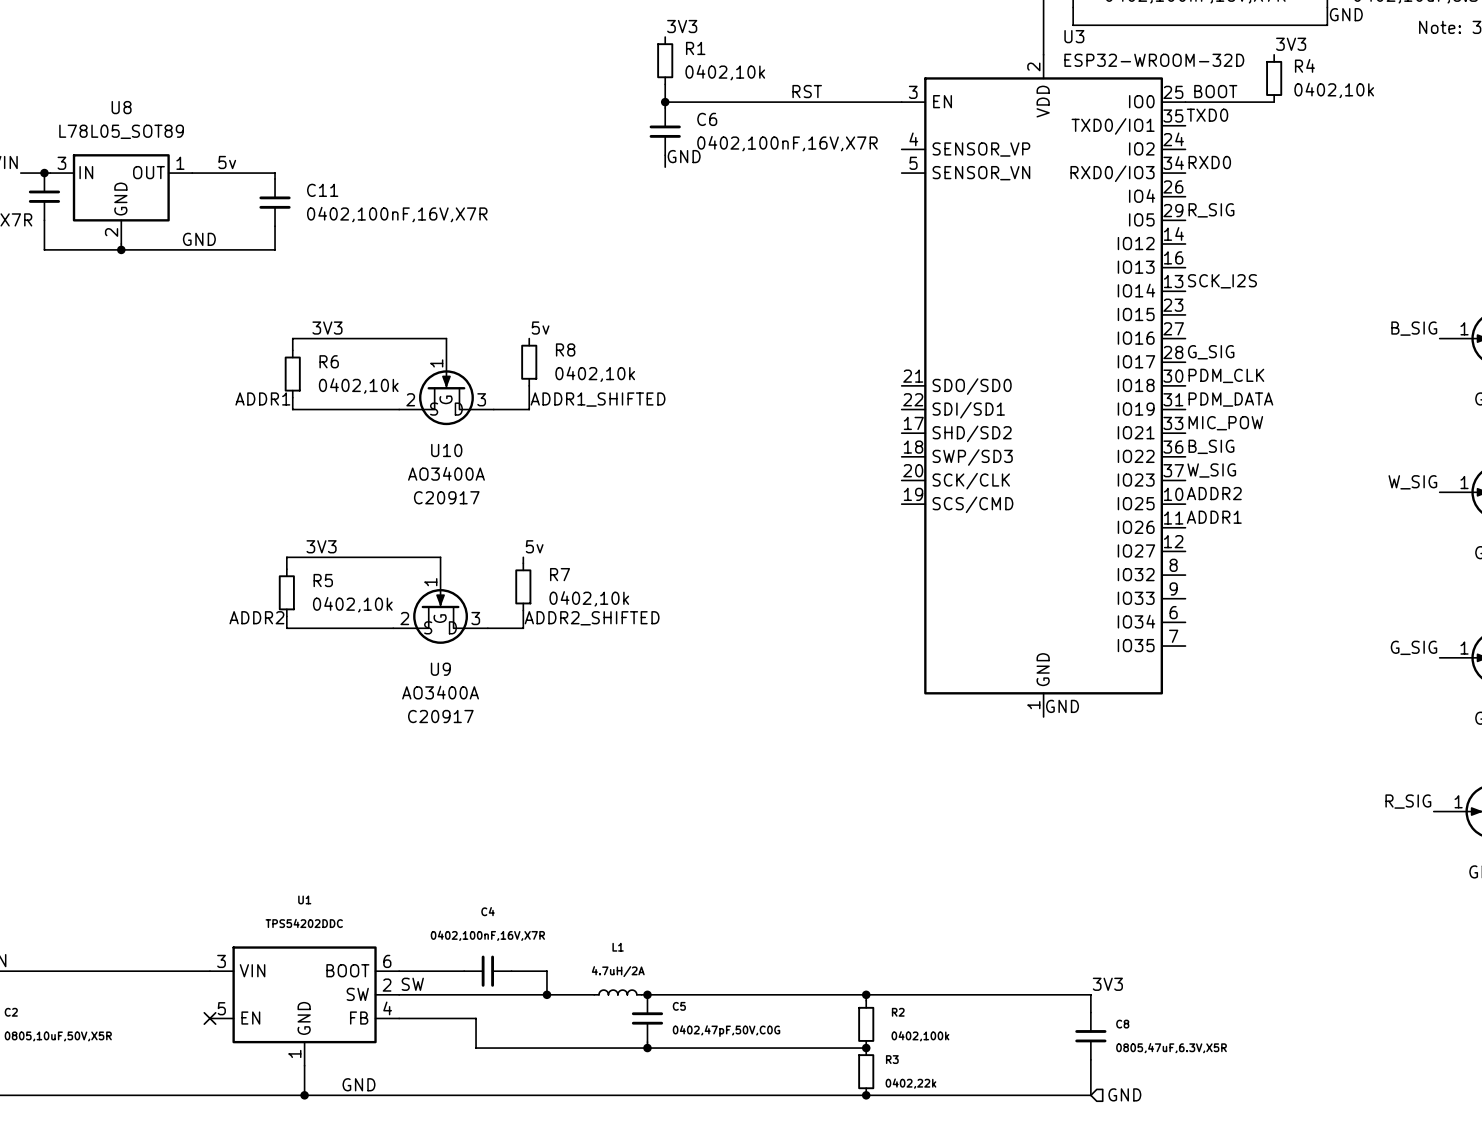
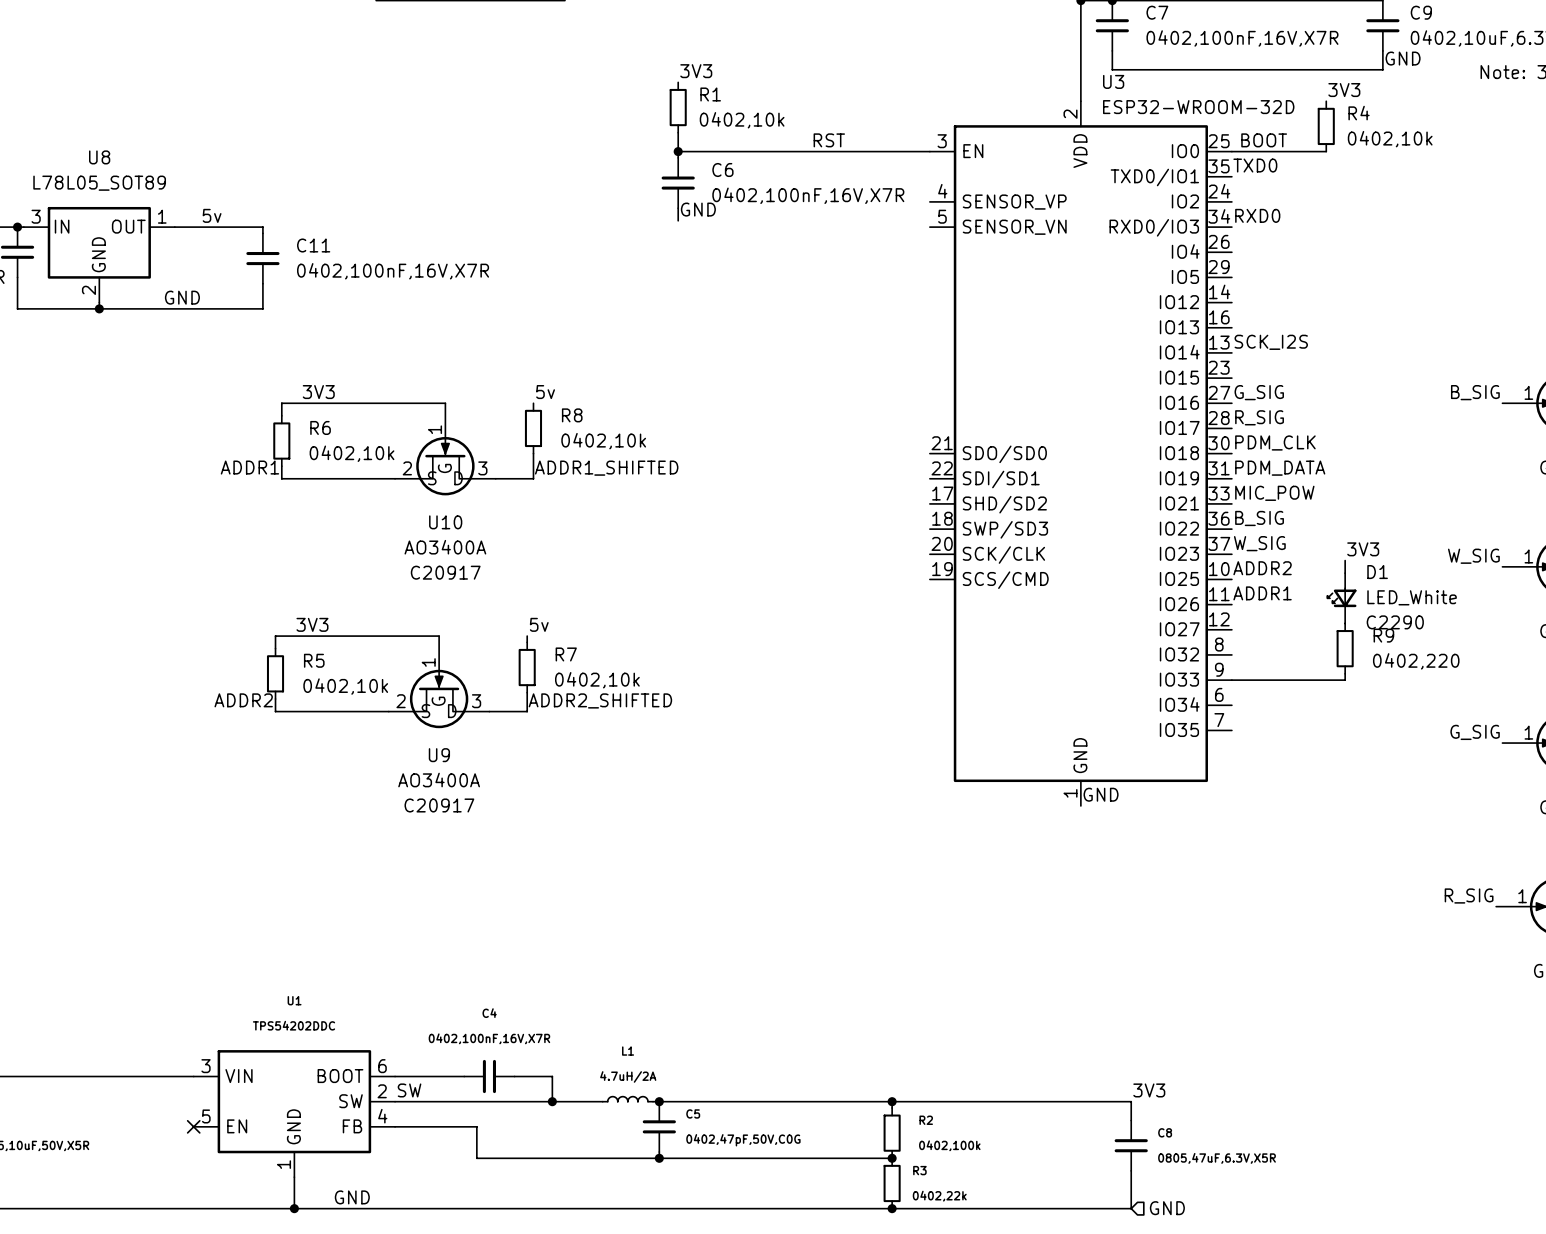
label: R_SIG (1211, 210) -> none
label: none -> G_SIG (1259, 392)
label: G_SIG (1211, 352) -> R_SIG (1259, 417)
label: none -> 3V3 (1363, 549)
wire: none -> (1345, 560) (1345, 573)
D1: none -> LED_White (1342, 598)
R9: none -> 0402,220 (1345, 648)
wire: none -> (1345, 673) (1345, 680) (1231, 680)

